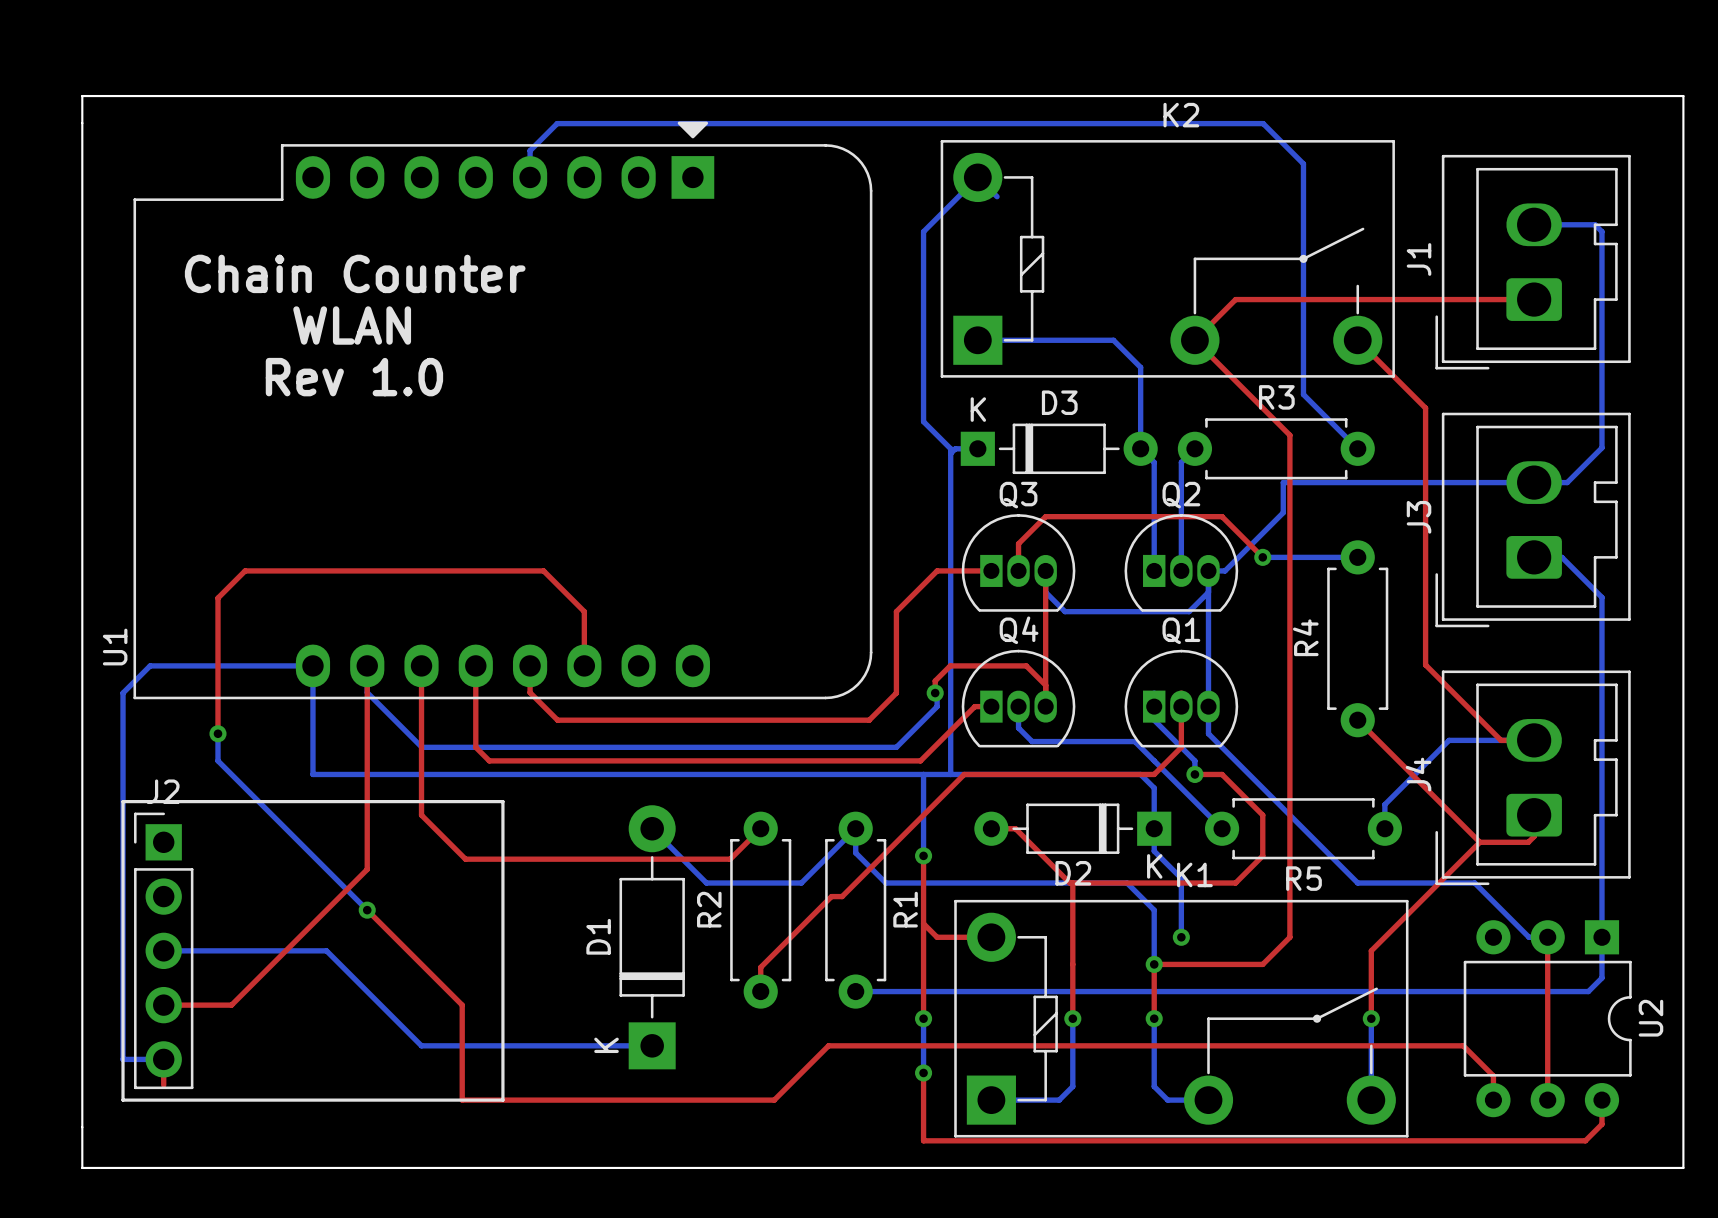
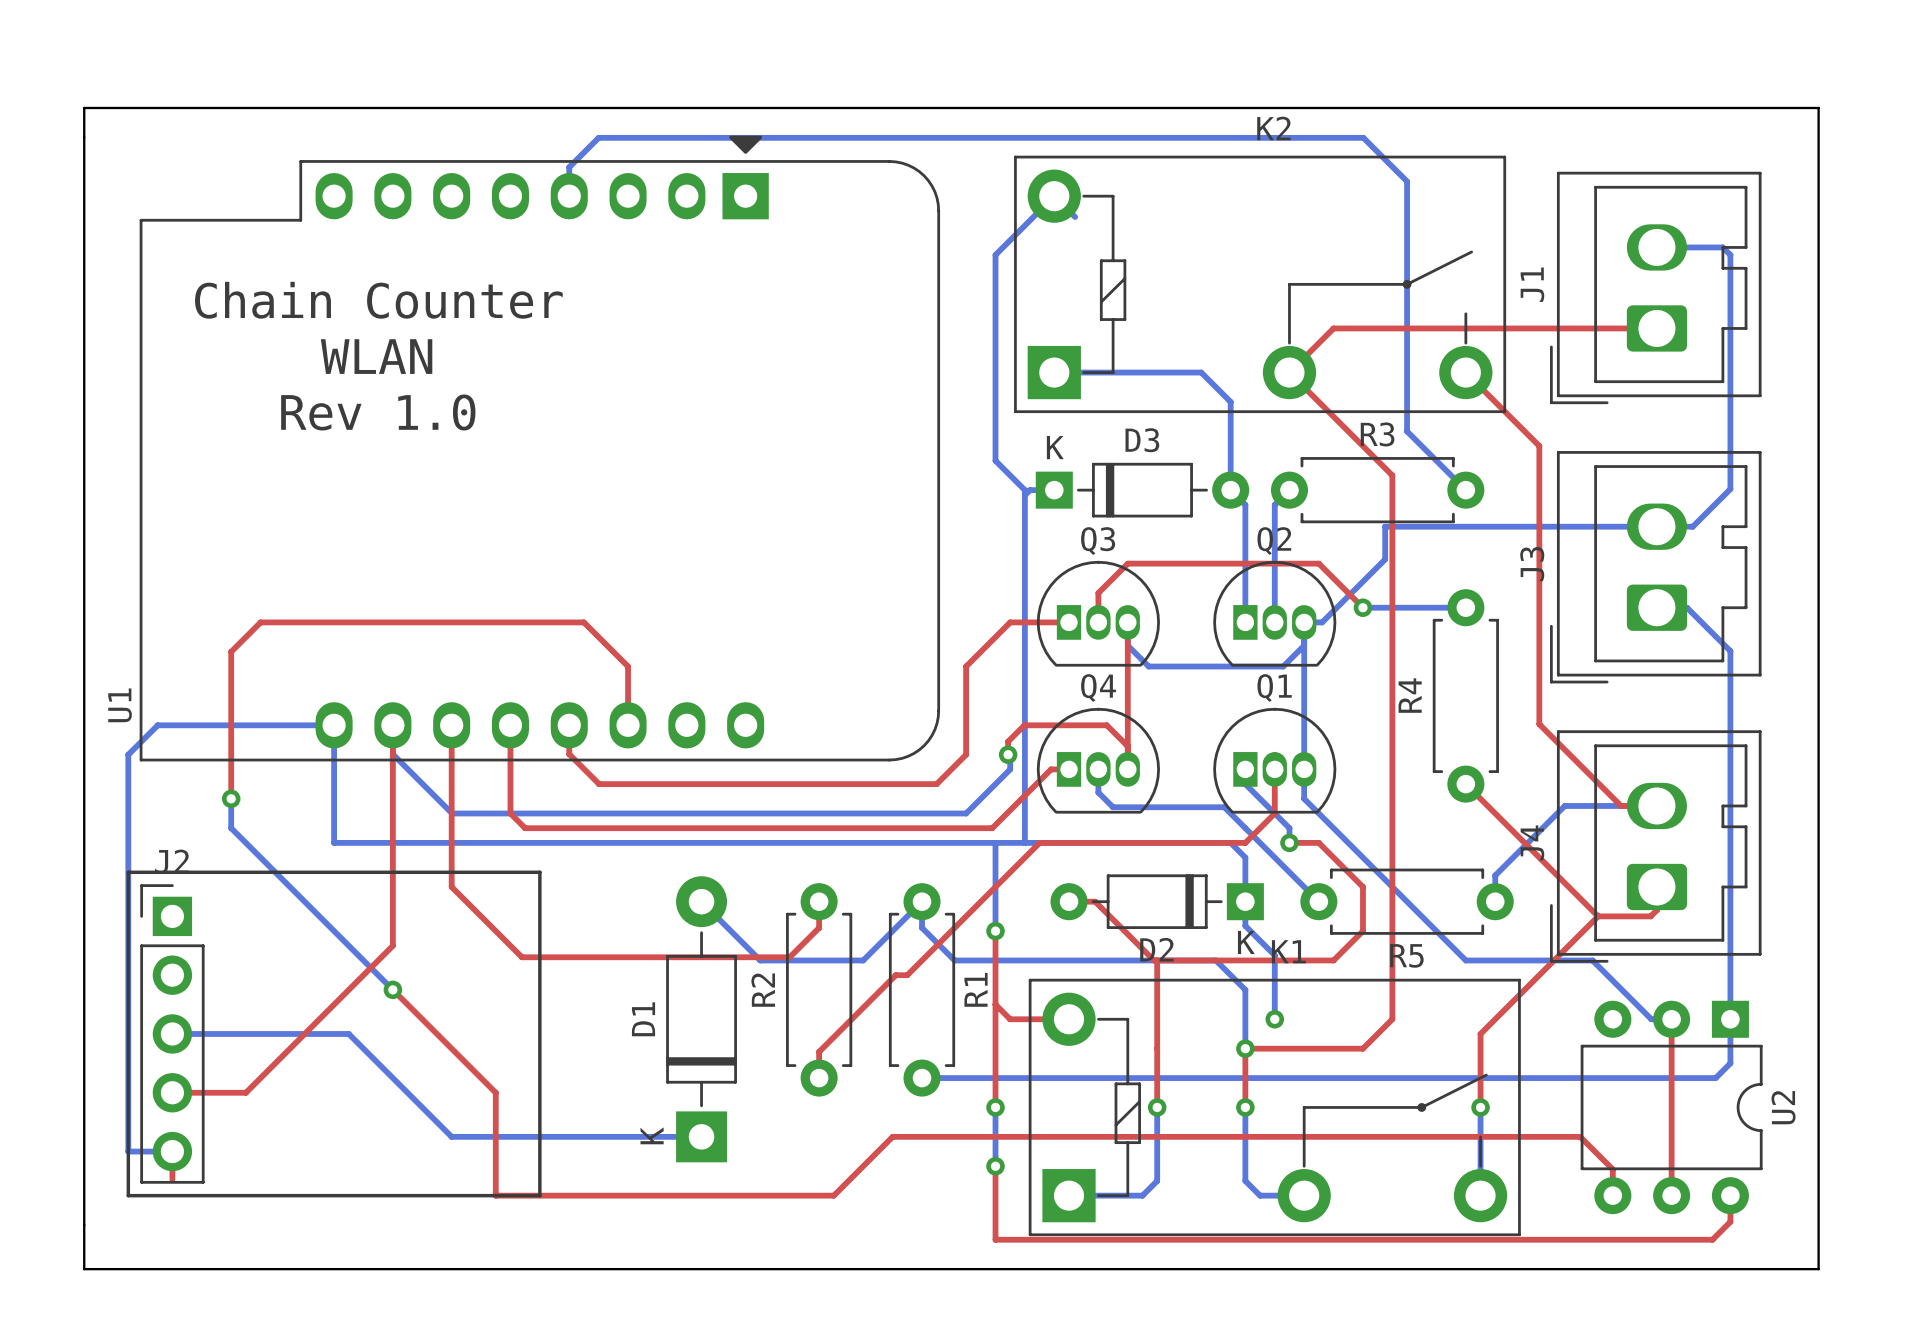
top track: (760, 828) (730, 859) (465, 859) -> (819, 901) (819, 927) (789, 957) (521, 957) (499, 934)

